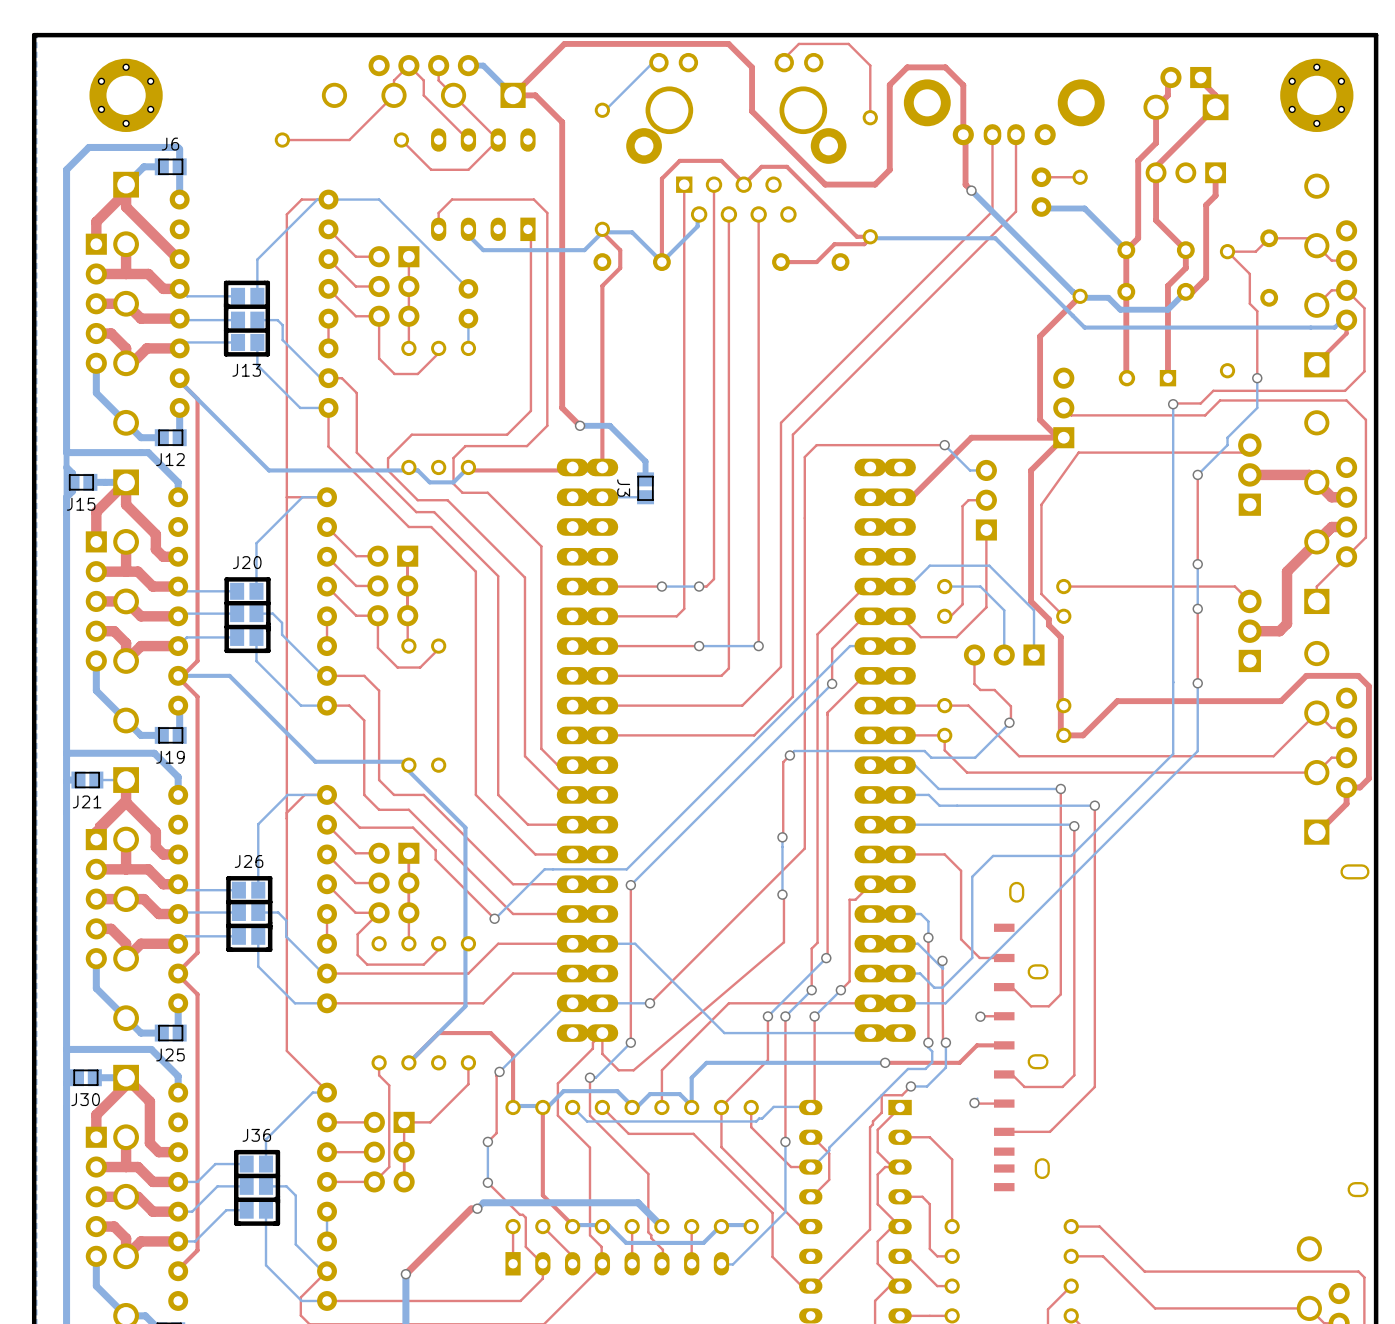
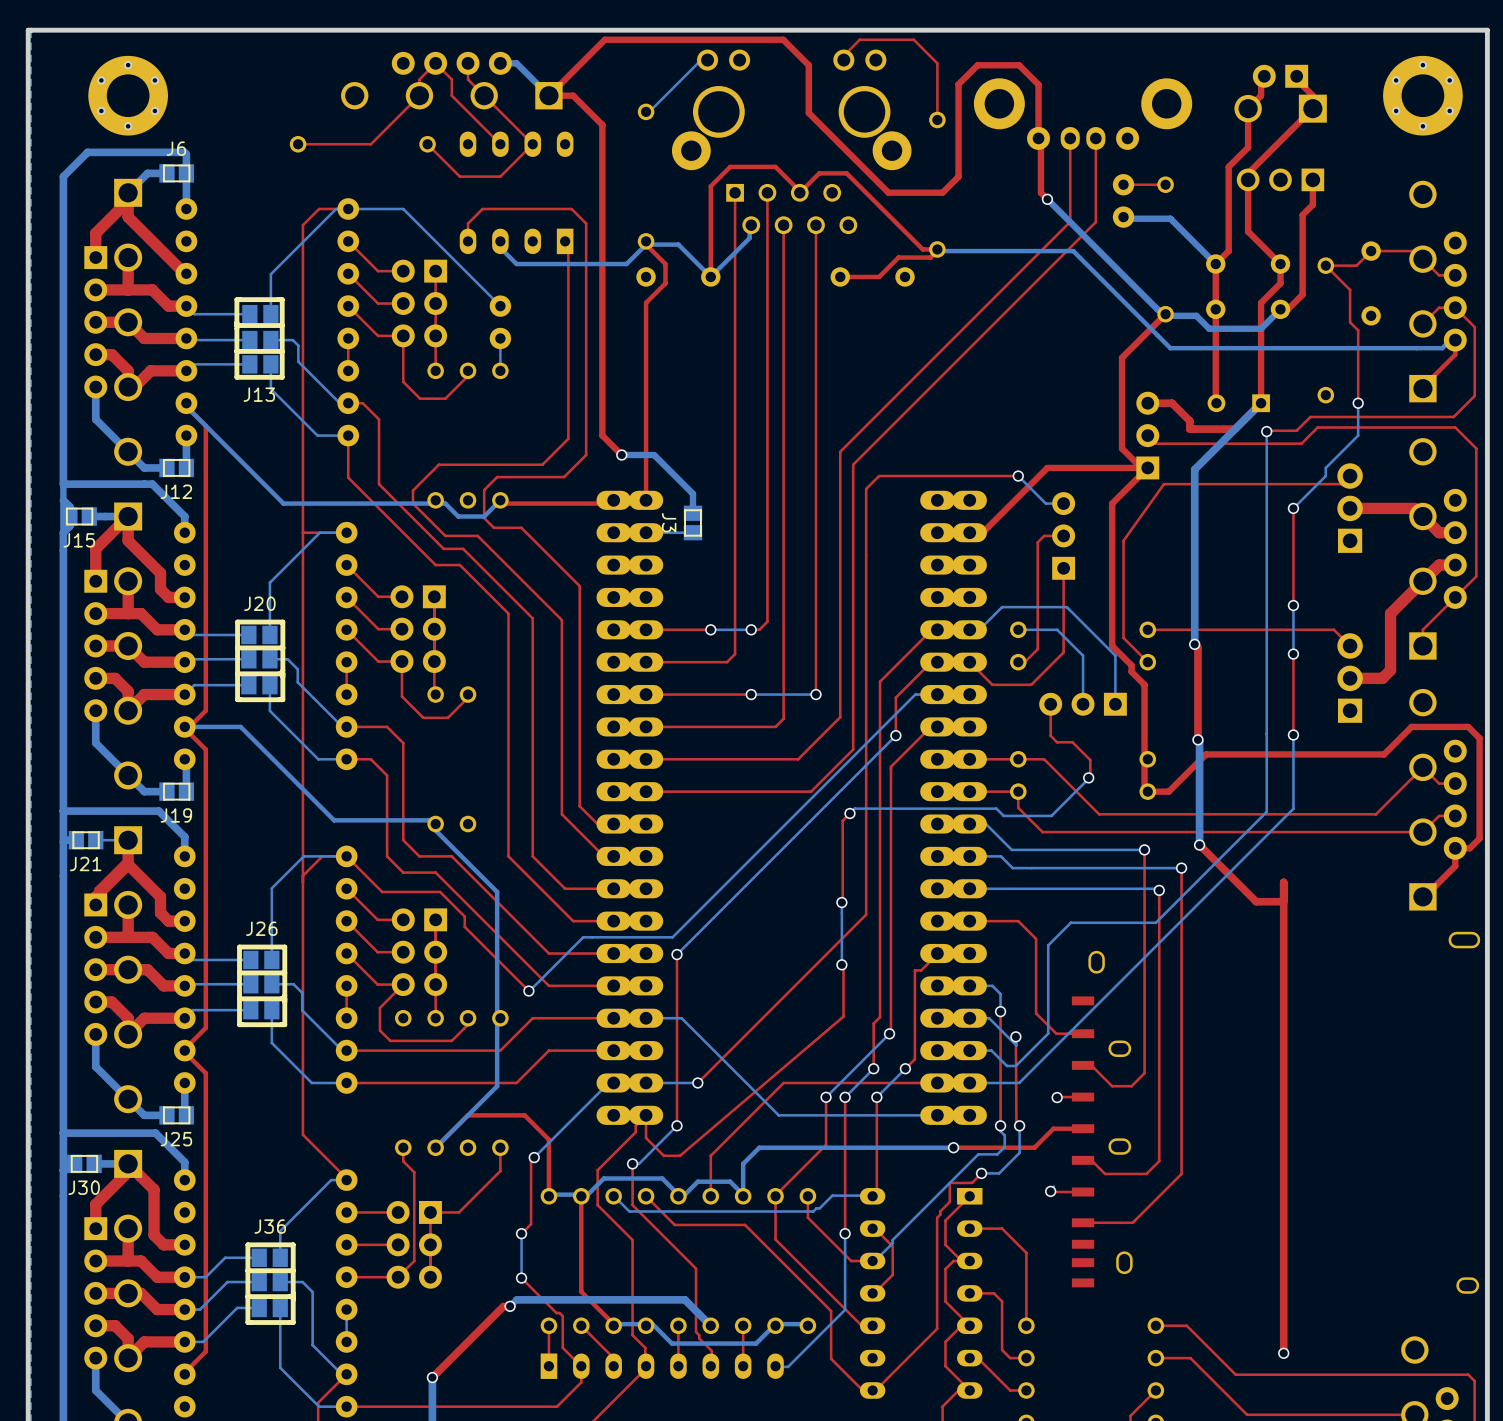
bottom track: none -> (1261, 403) (1194, 469) (1194, 644)
top track: none -> (1261, 403) (1235, 429) (1189, 429) (1189, 421) (1172, 403) (1147, 403)
top track: none -> (1194, 644) (1197, 647) (1197, 739)
via: none -> (1194, 644)
bottom track: none -> (1197, 739) (1199, 741) (1199, 845)
via: none -> (1197, 739)
top track: none -> (1199, 845) (1256, 901) (1283, 901)
via: none -> (1199, 845)
top track: none -> (1283, 882) (1283, 1353)
via: none -> (1283, 1353)

